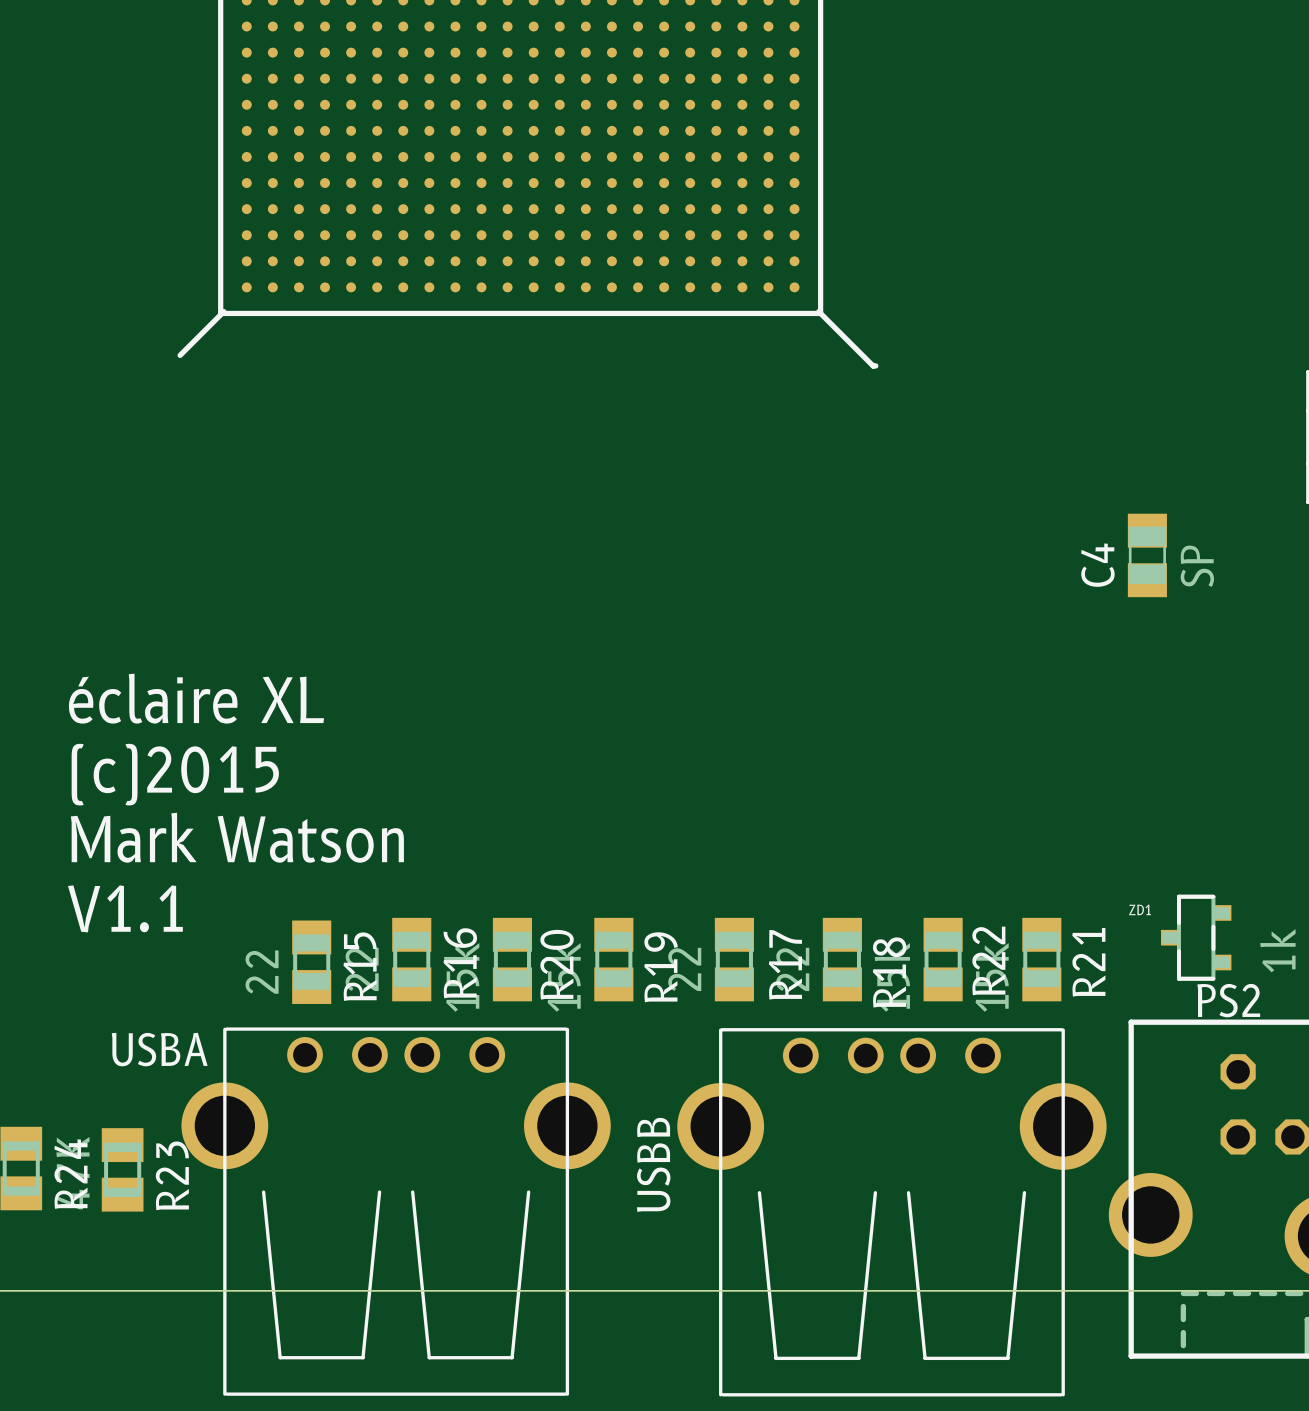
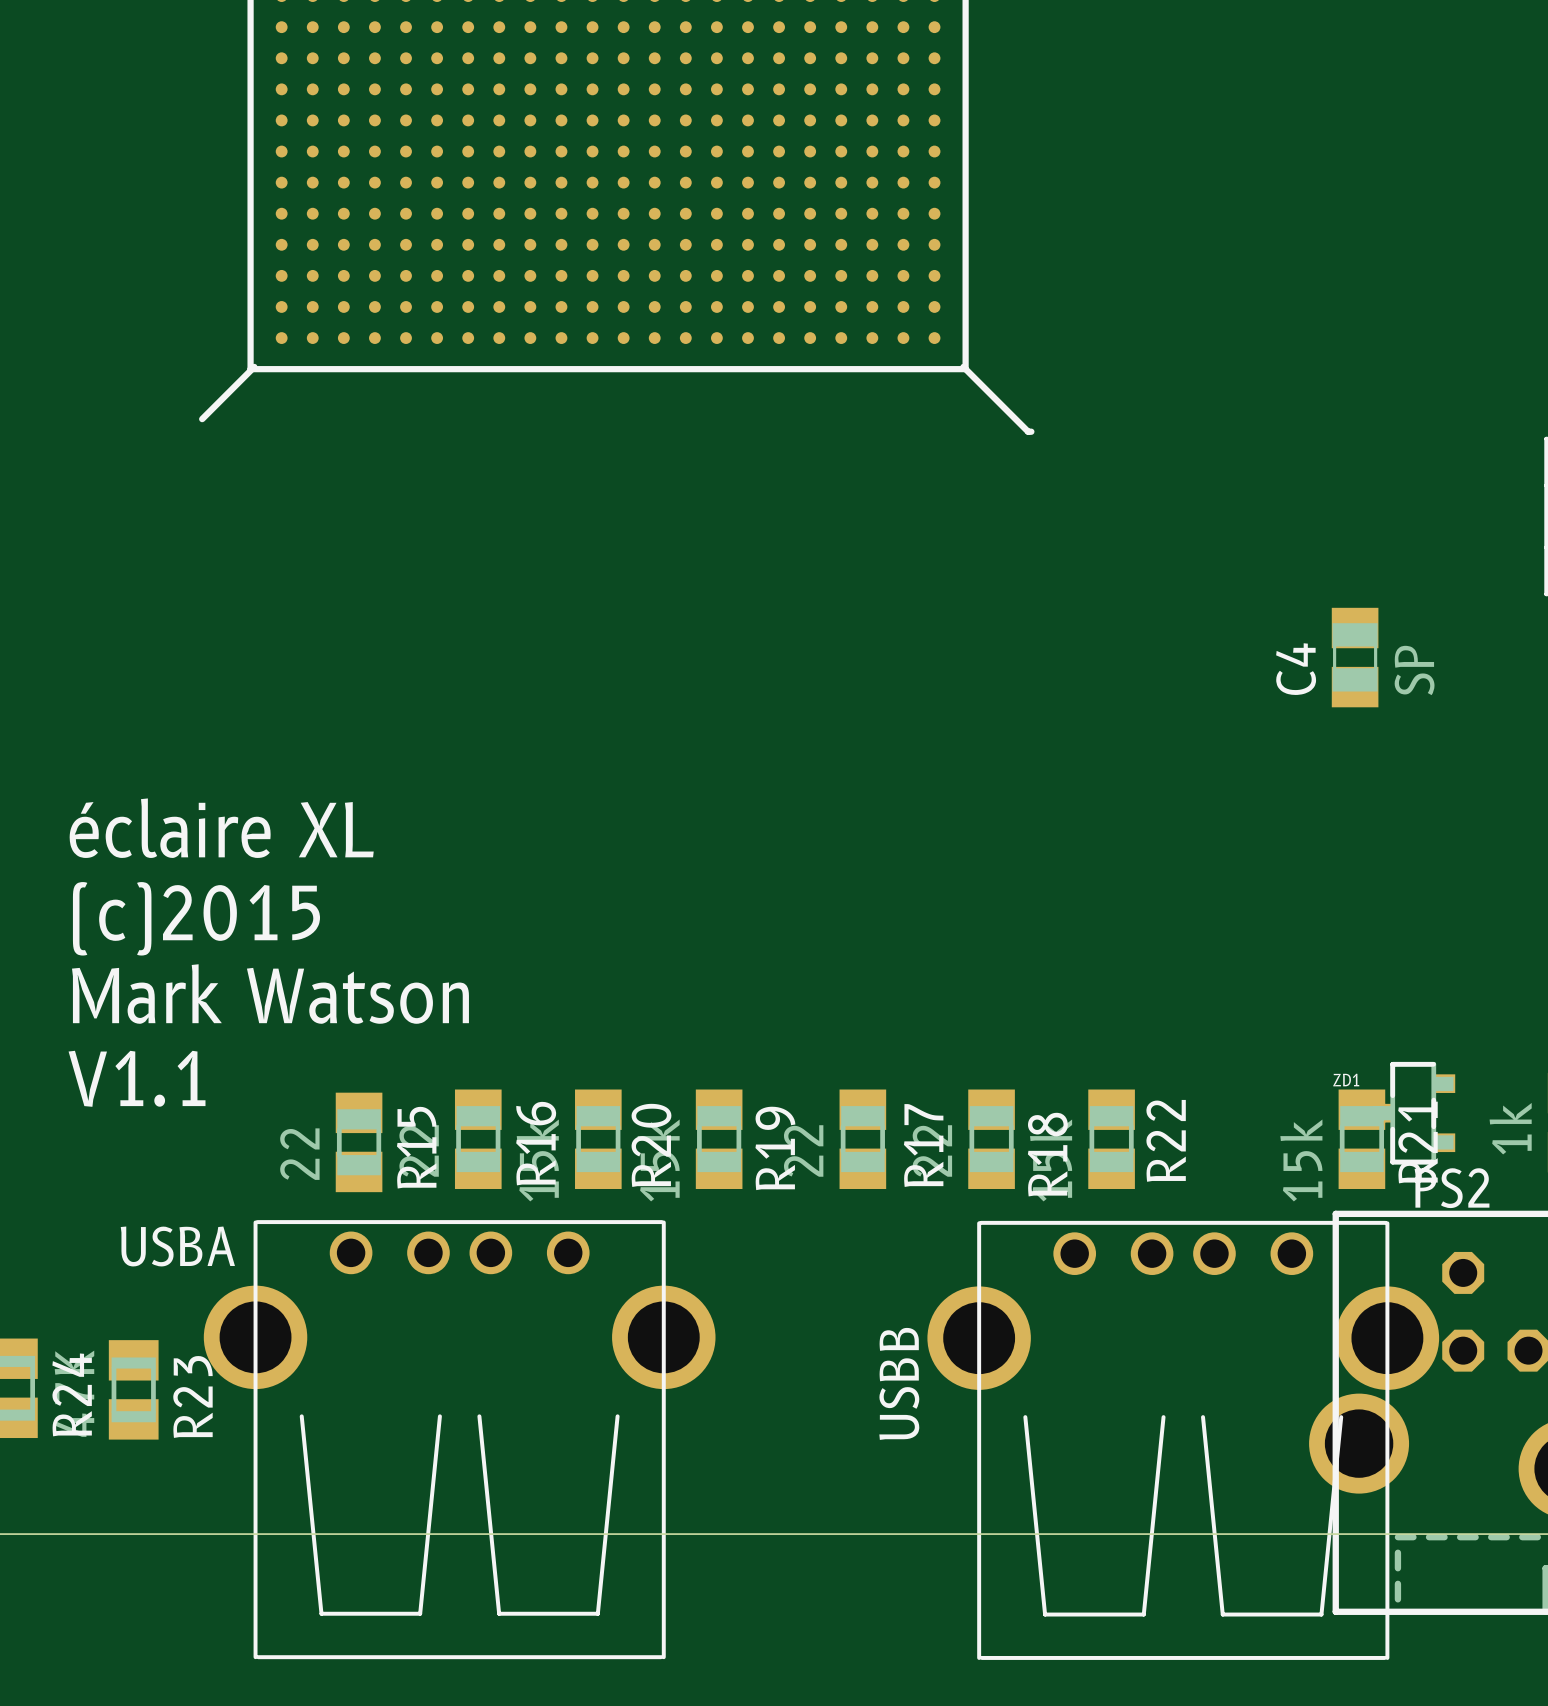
R21 position: (1041, 959) -> (1361, 1139)
USBB position: (891, 1212) -> (1183, 1440)

